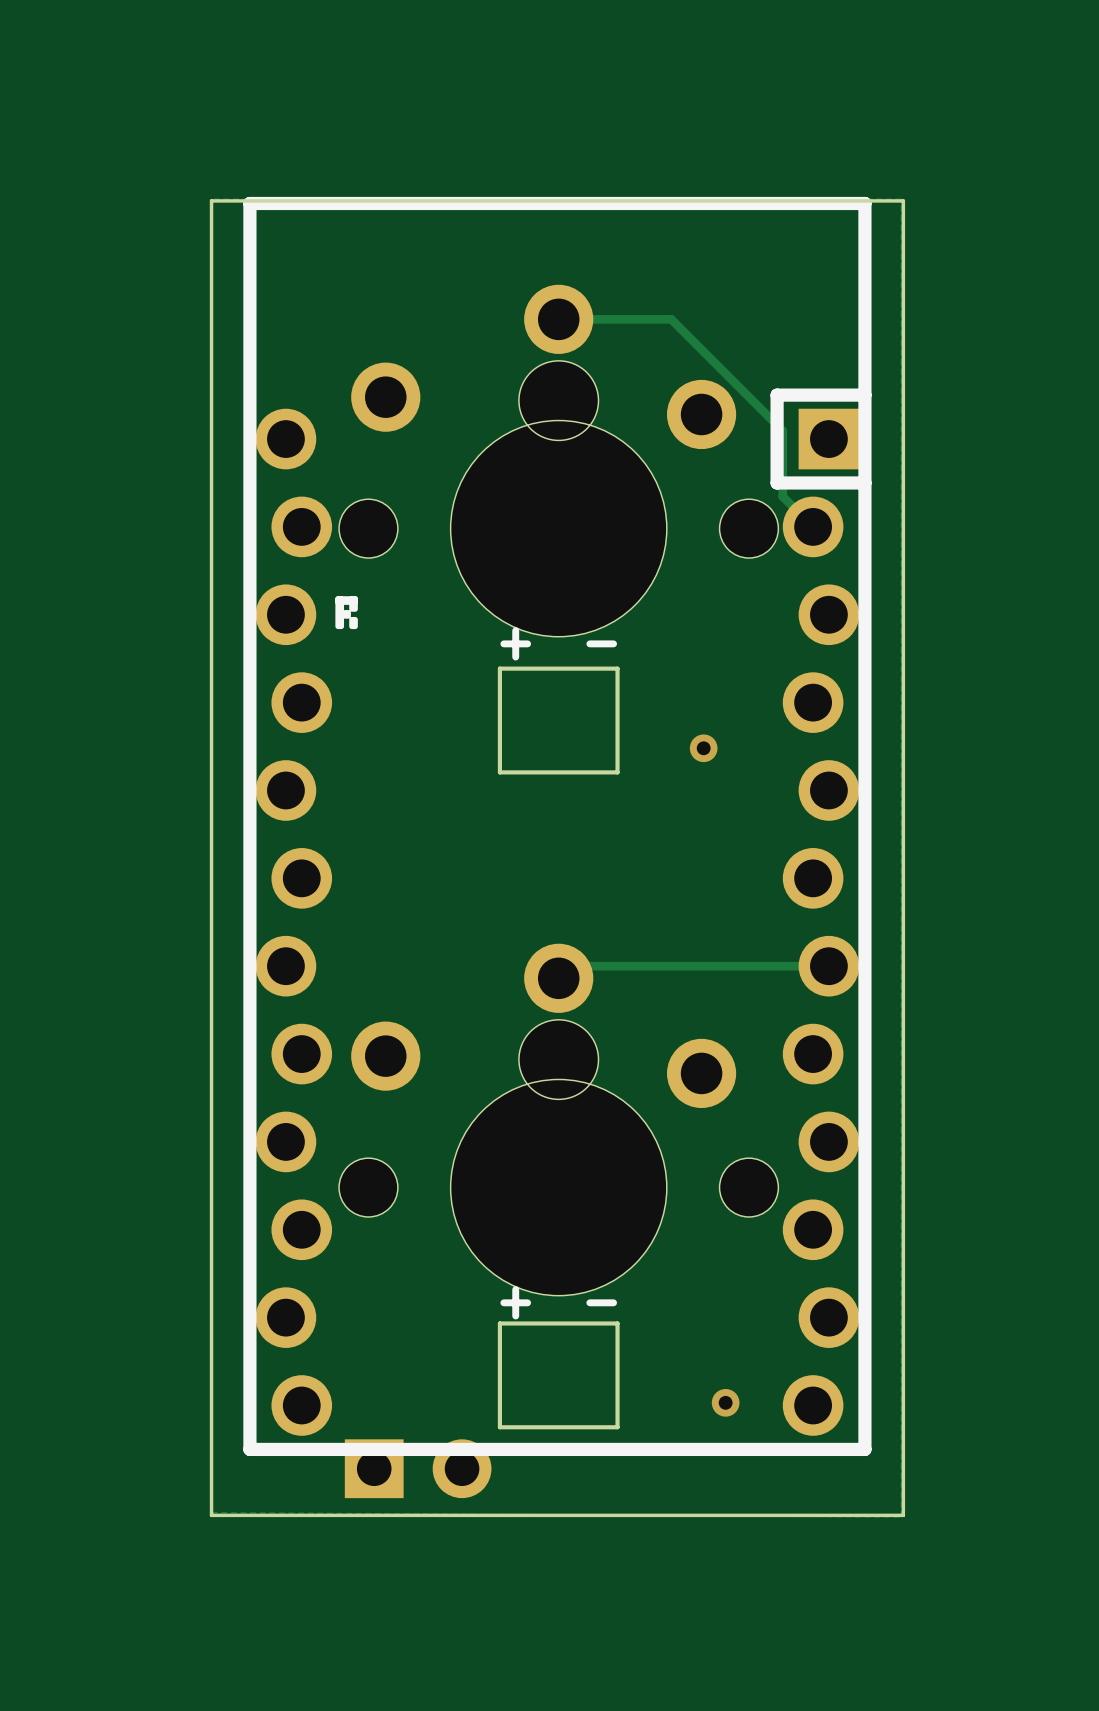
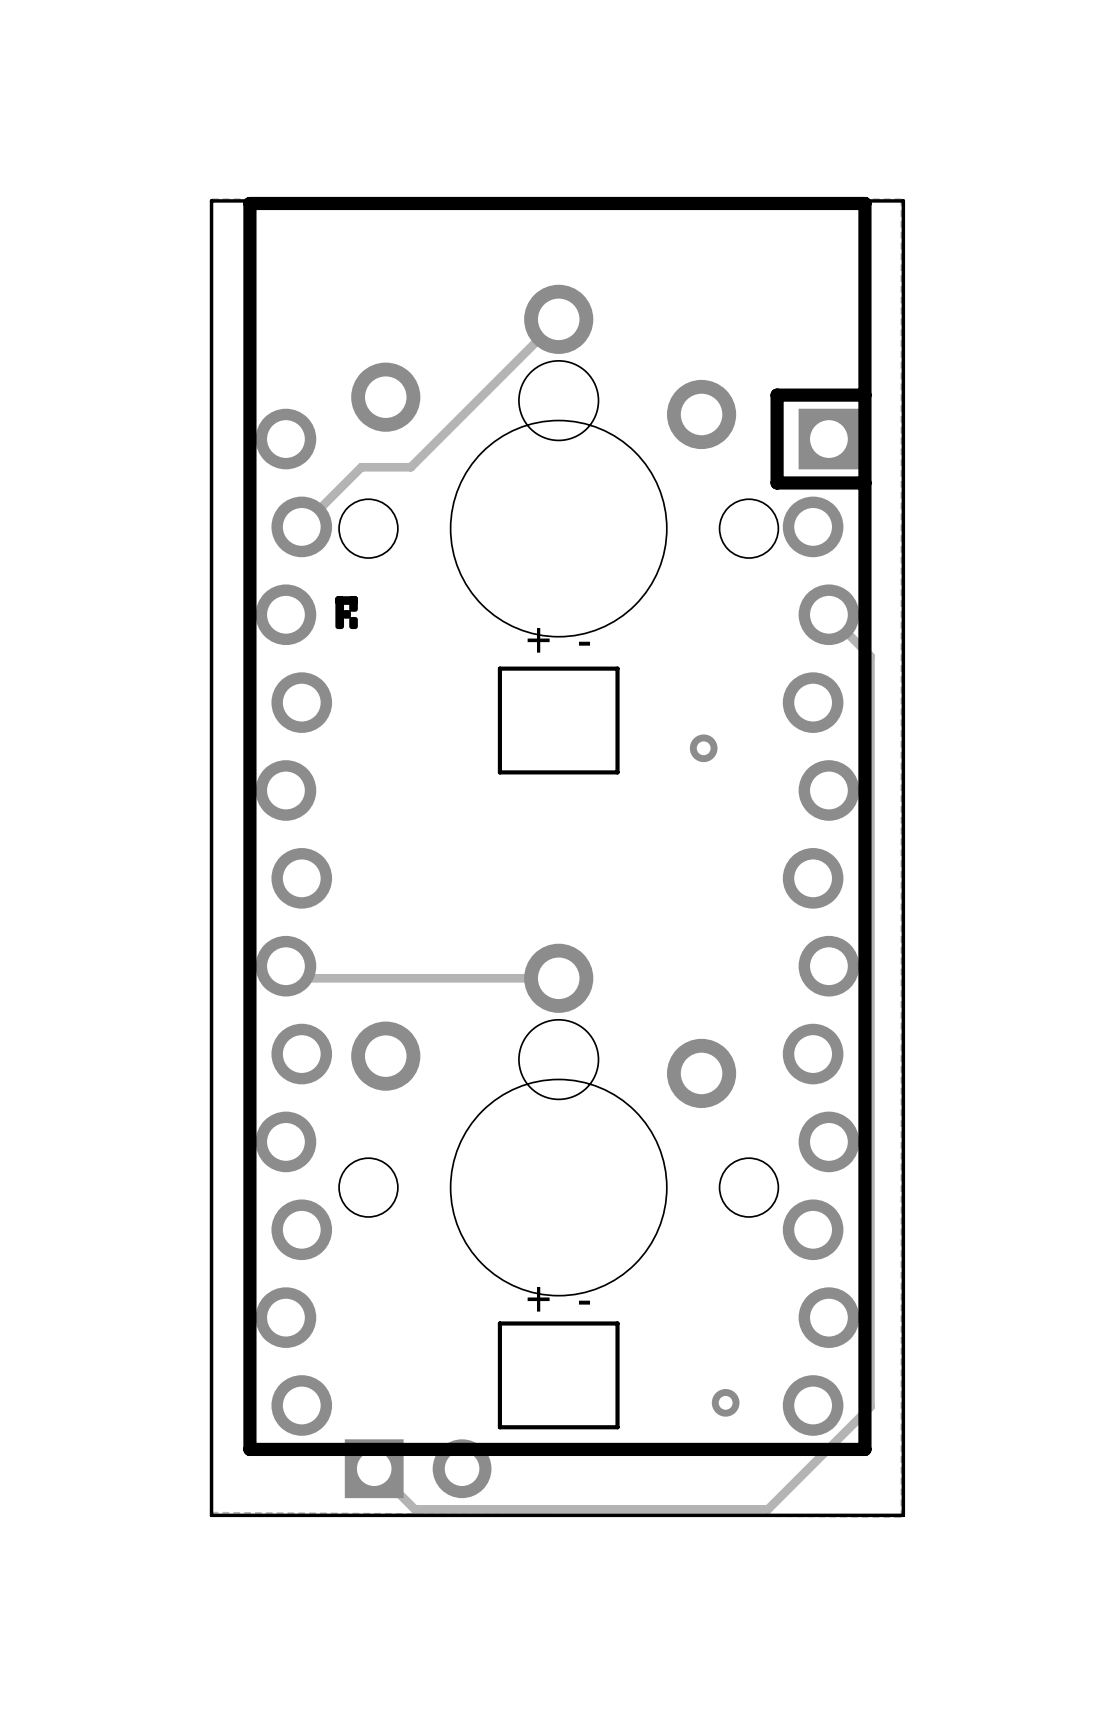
track: (558, 319) (671, 319) (782, 430) (782, 496) (813, 526) -> (558, 319) (410, 467) (361, 467) (301, 526)
track: none -> (828, 614) (870, 656) (870, 1406) (767, 1509) (414, 1509) (374, 1468)
track: (828, 966) (570, 966) (558, 978) -> (285, 966) (298, 978) (558, 978)

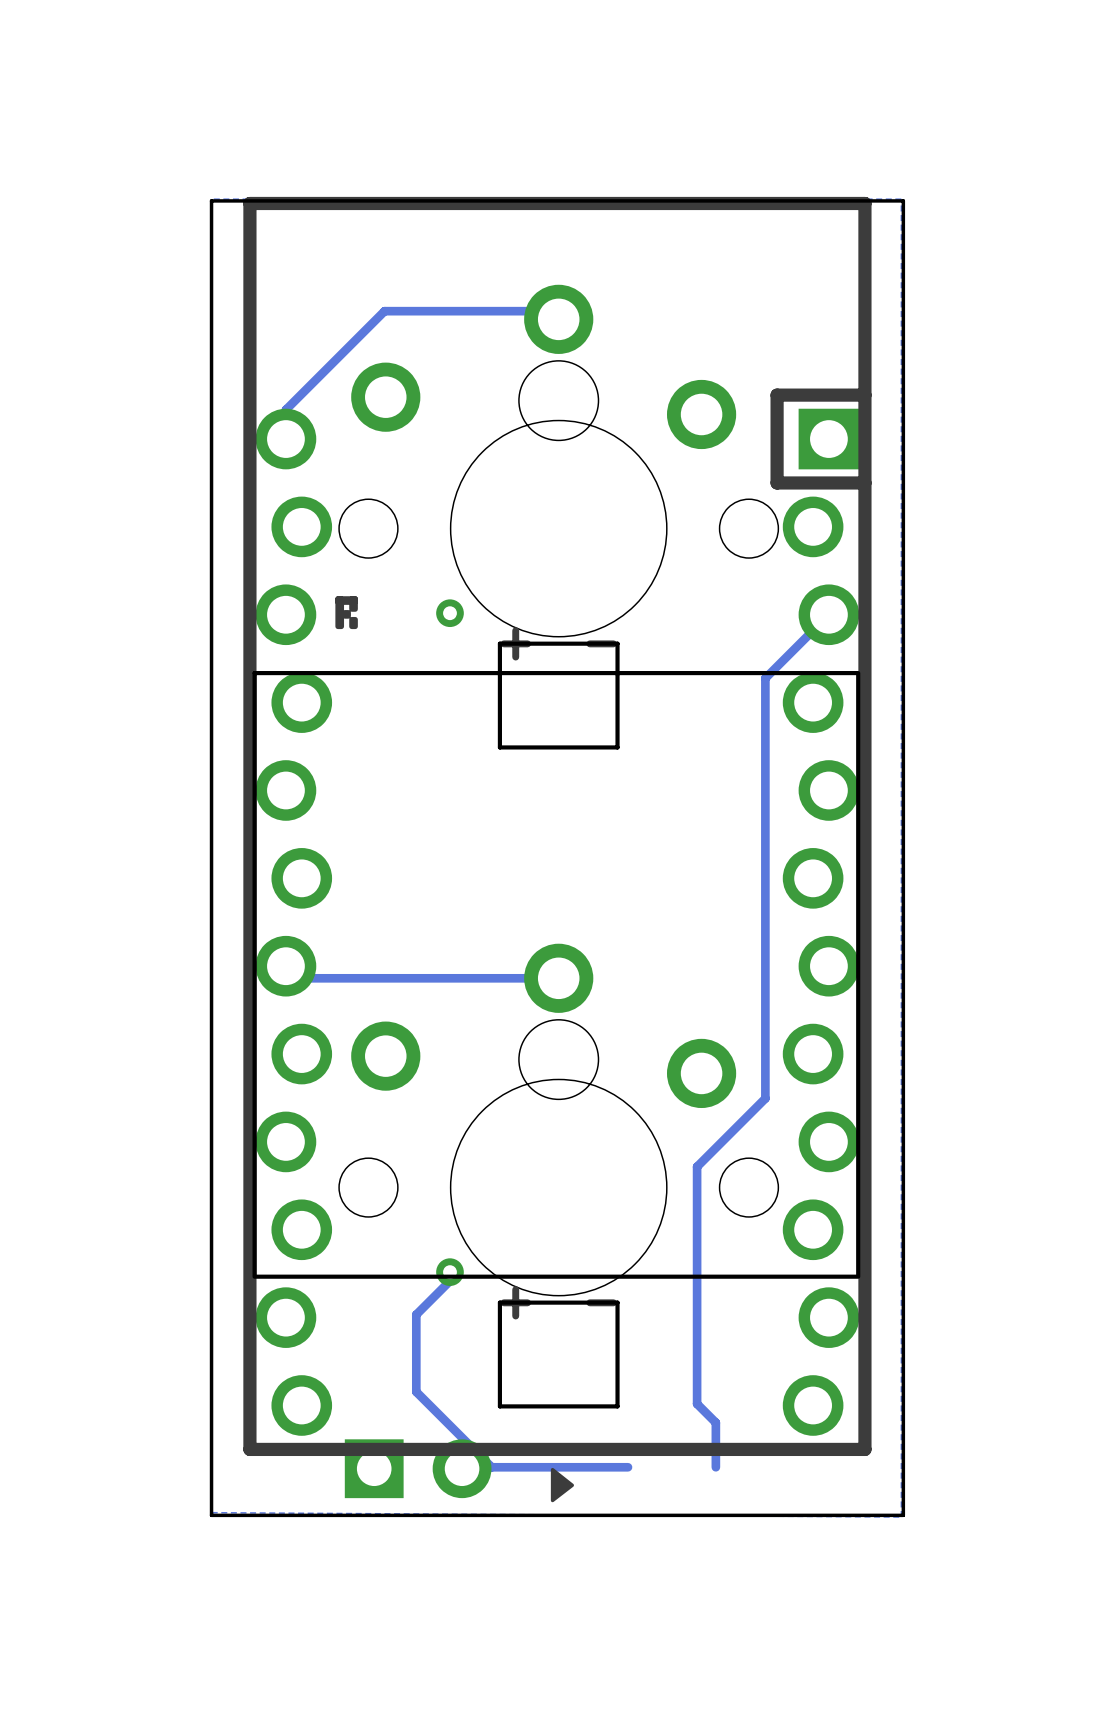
track: (558, 319) (410, 467) (361, 467) (301, 526) -> (558, 319) (559, 311) (384, 311) (285, 409) (285, 439)
via: none -> (449, 613)
track: (828, 614) (870, 656) (870, 1406) (767, 1509) (414, 1509) (374, 1468) -> (828, 614) (765, 678) (765, 1098) (697, 1166) (697, 1403) (715, 1422) (715, 1467)
drawing: none -> [252, 671, 861, 1279]
part position: (558, 720) -> (558, 695)
via: (703, 748) -> none
via: none -> (449, 1272)
track: none -> (449, 1281) (416, 1314) (416, 1391) (491, 1467) (628, 1467)
part position: (558, 1375) -> (558, 1354)
via: (725, 1402) -> none
drawing: none -> [550, 1467, 574, 1503]

